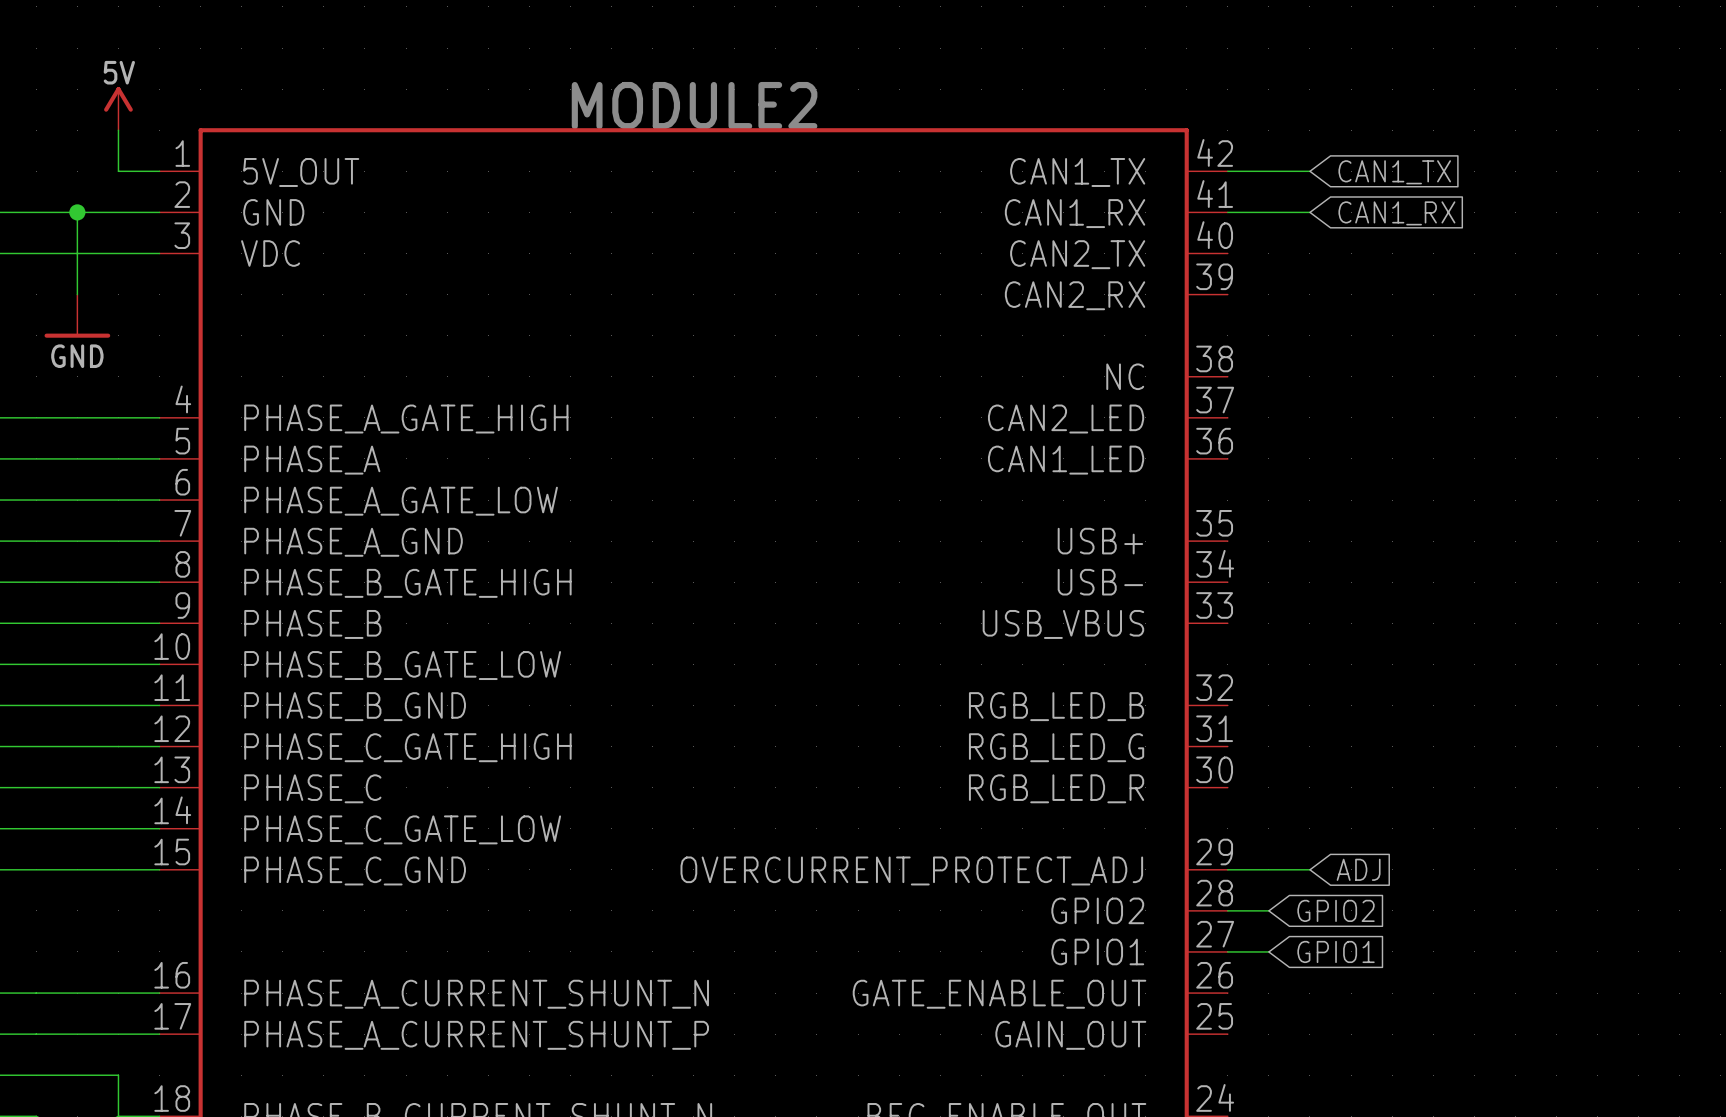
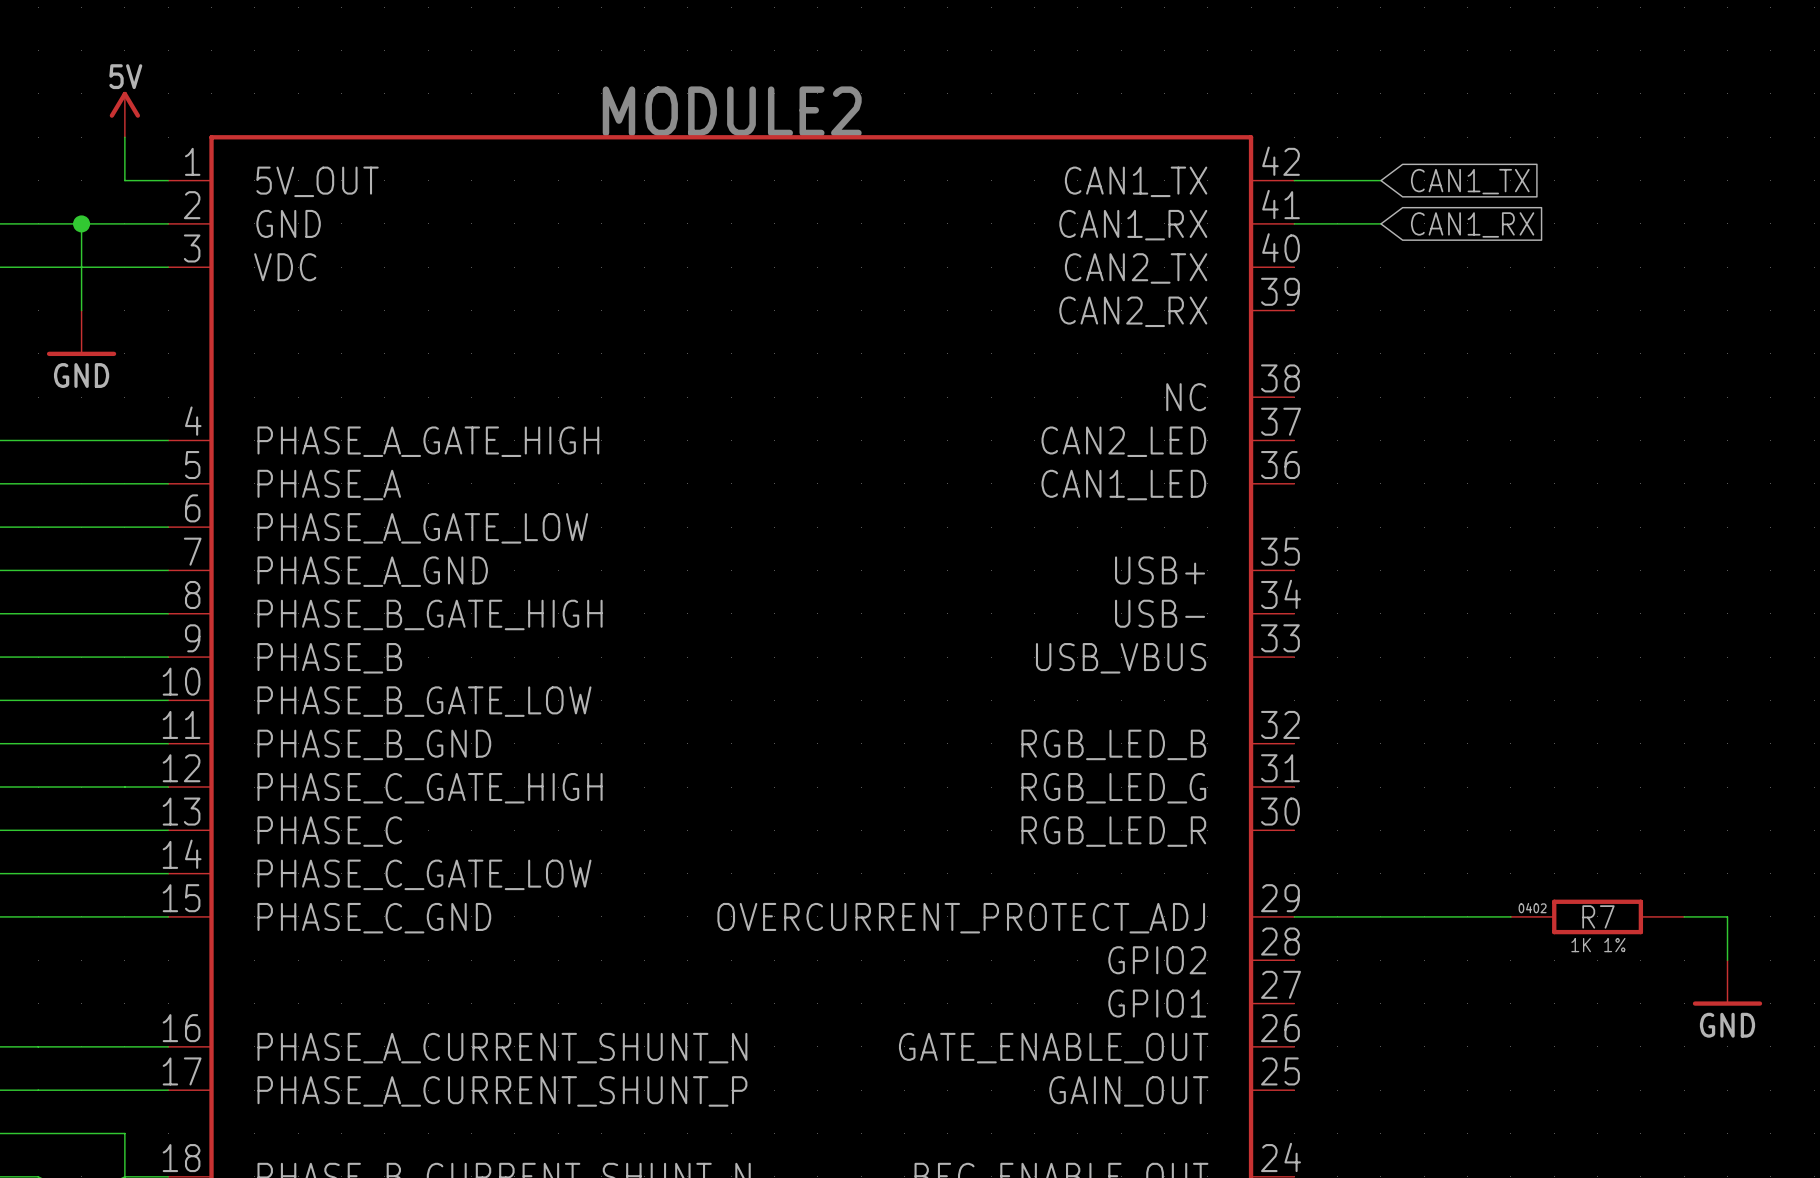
wire: none -> (1380, 916) (1510, 916)
global label: ADJ (1358, 869) -> none
R7: none -> 1K (1597, 916)
wire: none -> (1684, 916) (1727, 916) (1727, 960)
wire: (1227, 910) (1268, 910) -> none
global label: GPIO2 (1336, 910) -> none
power symbol: none -> GND (1727, 982)
wire: (1227, 951) (1268, 951) -> none
global label: GPIO1 (1336, 951) -> none

